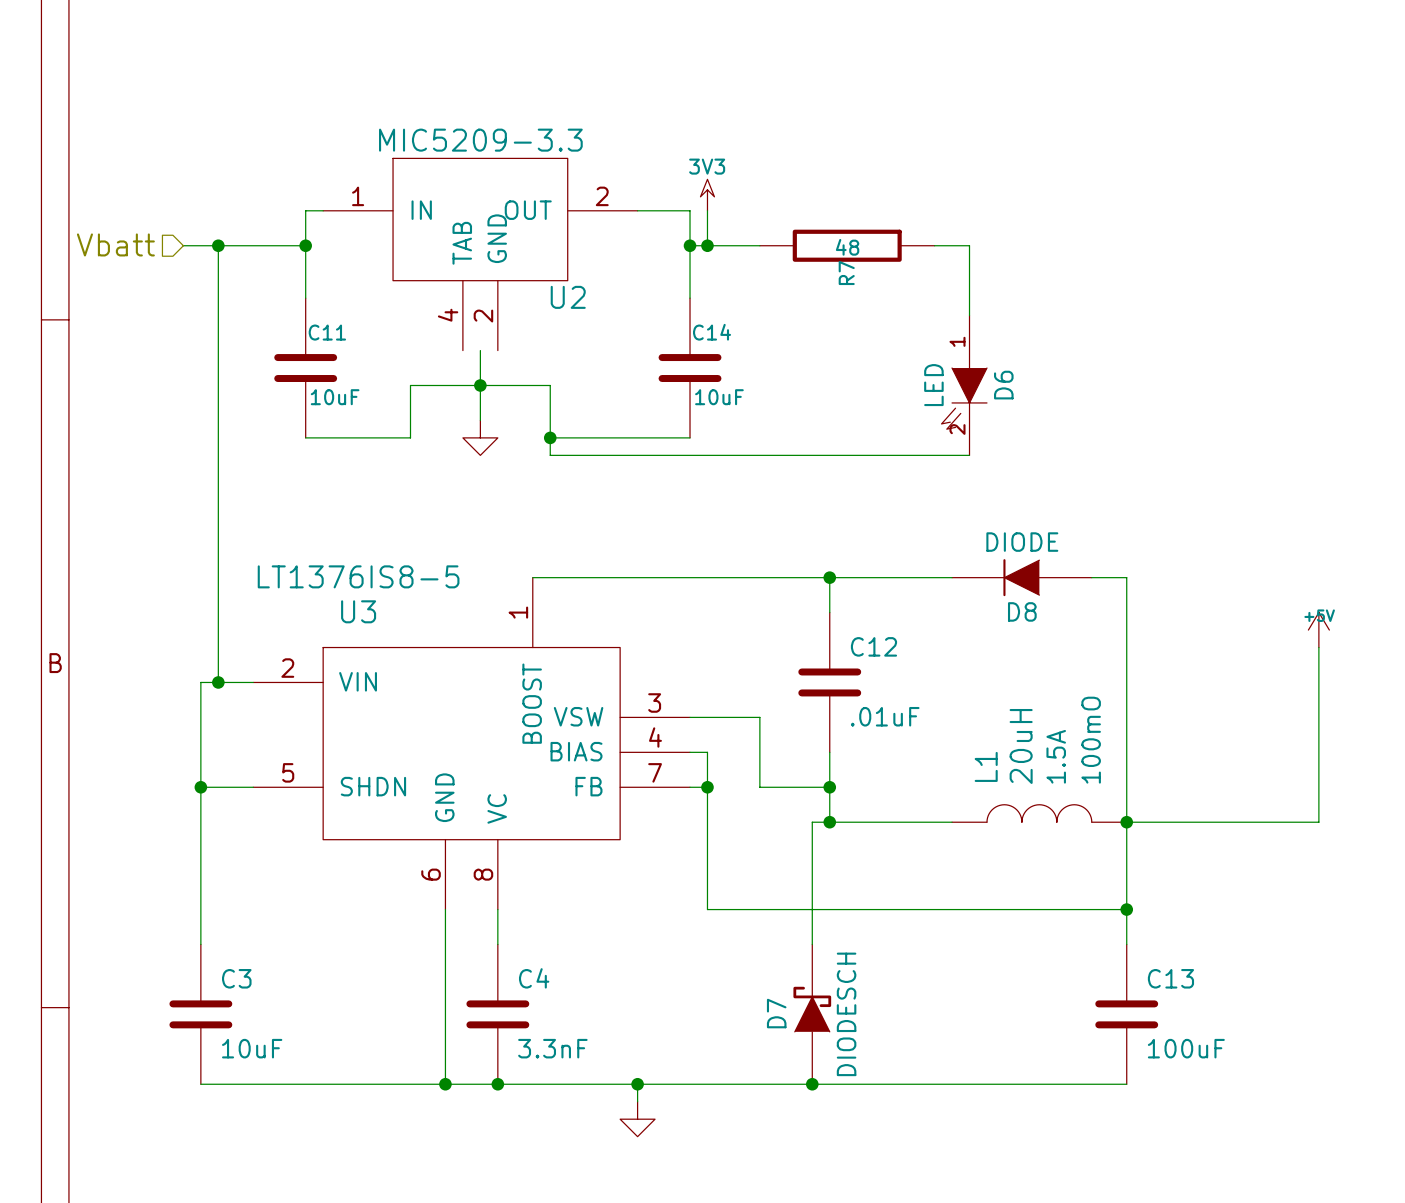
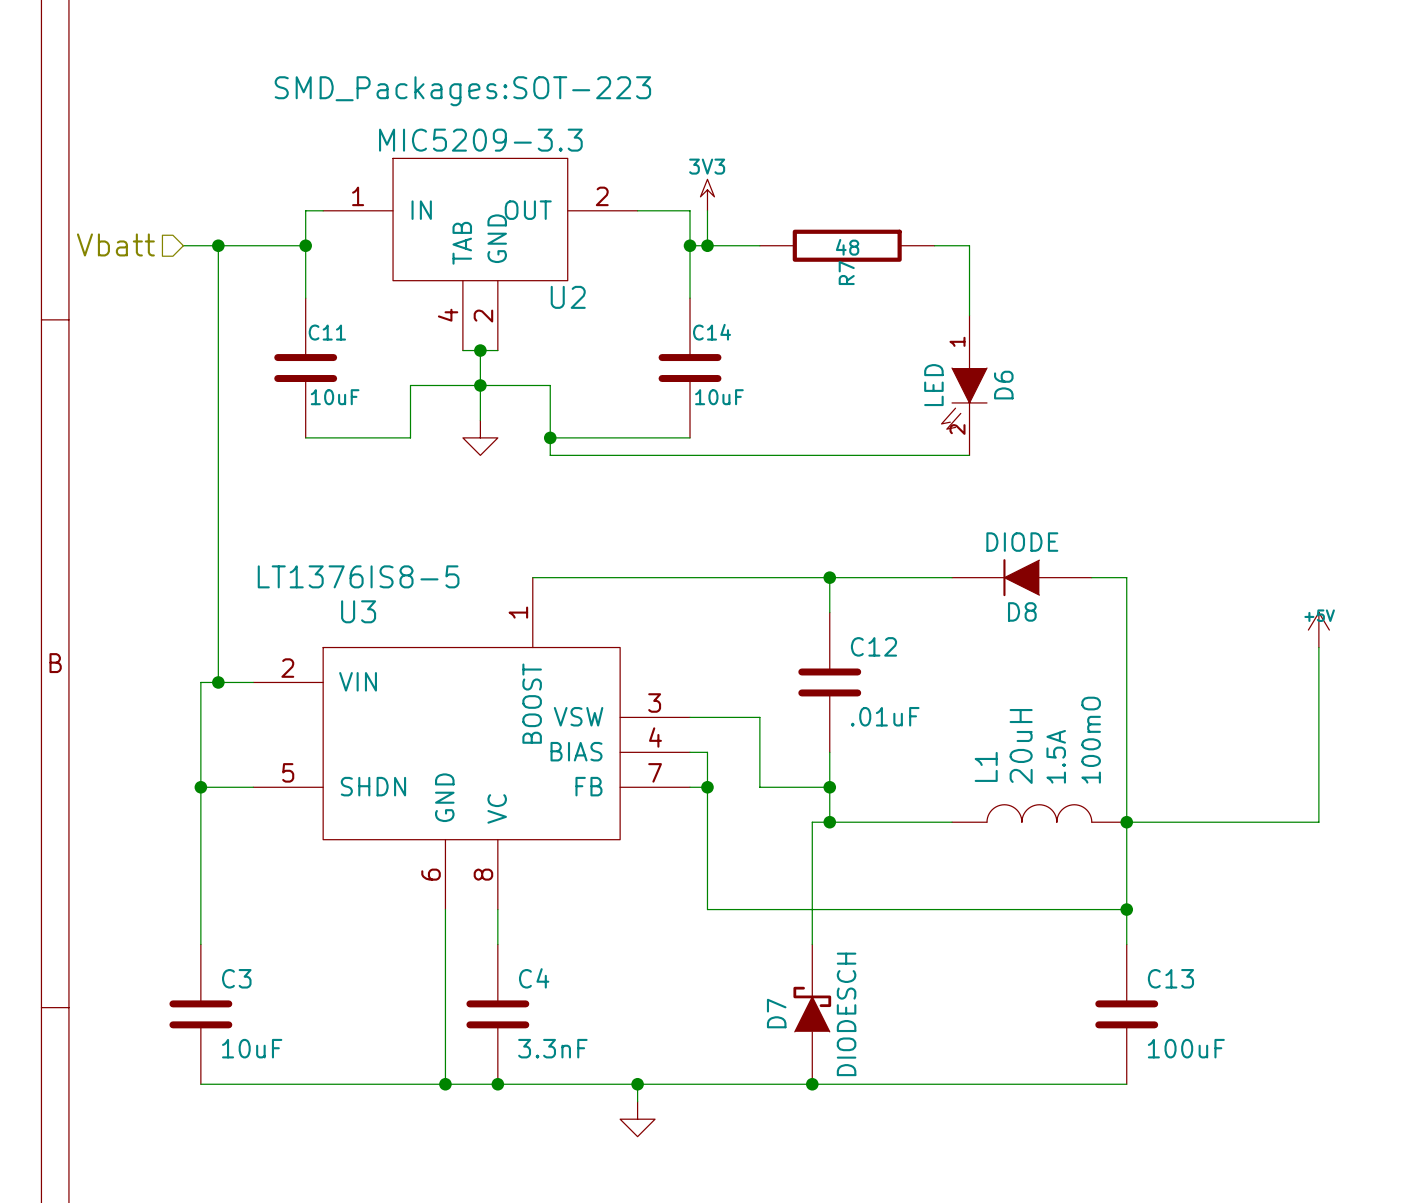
U2 text: none -> SMD_Packages:SOT-223 (462, 91)
wire: none -> (462, 350) (497, 350)
junction: none -> (480, 350)

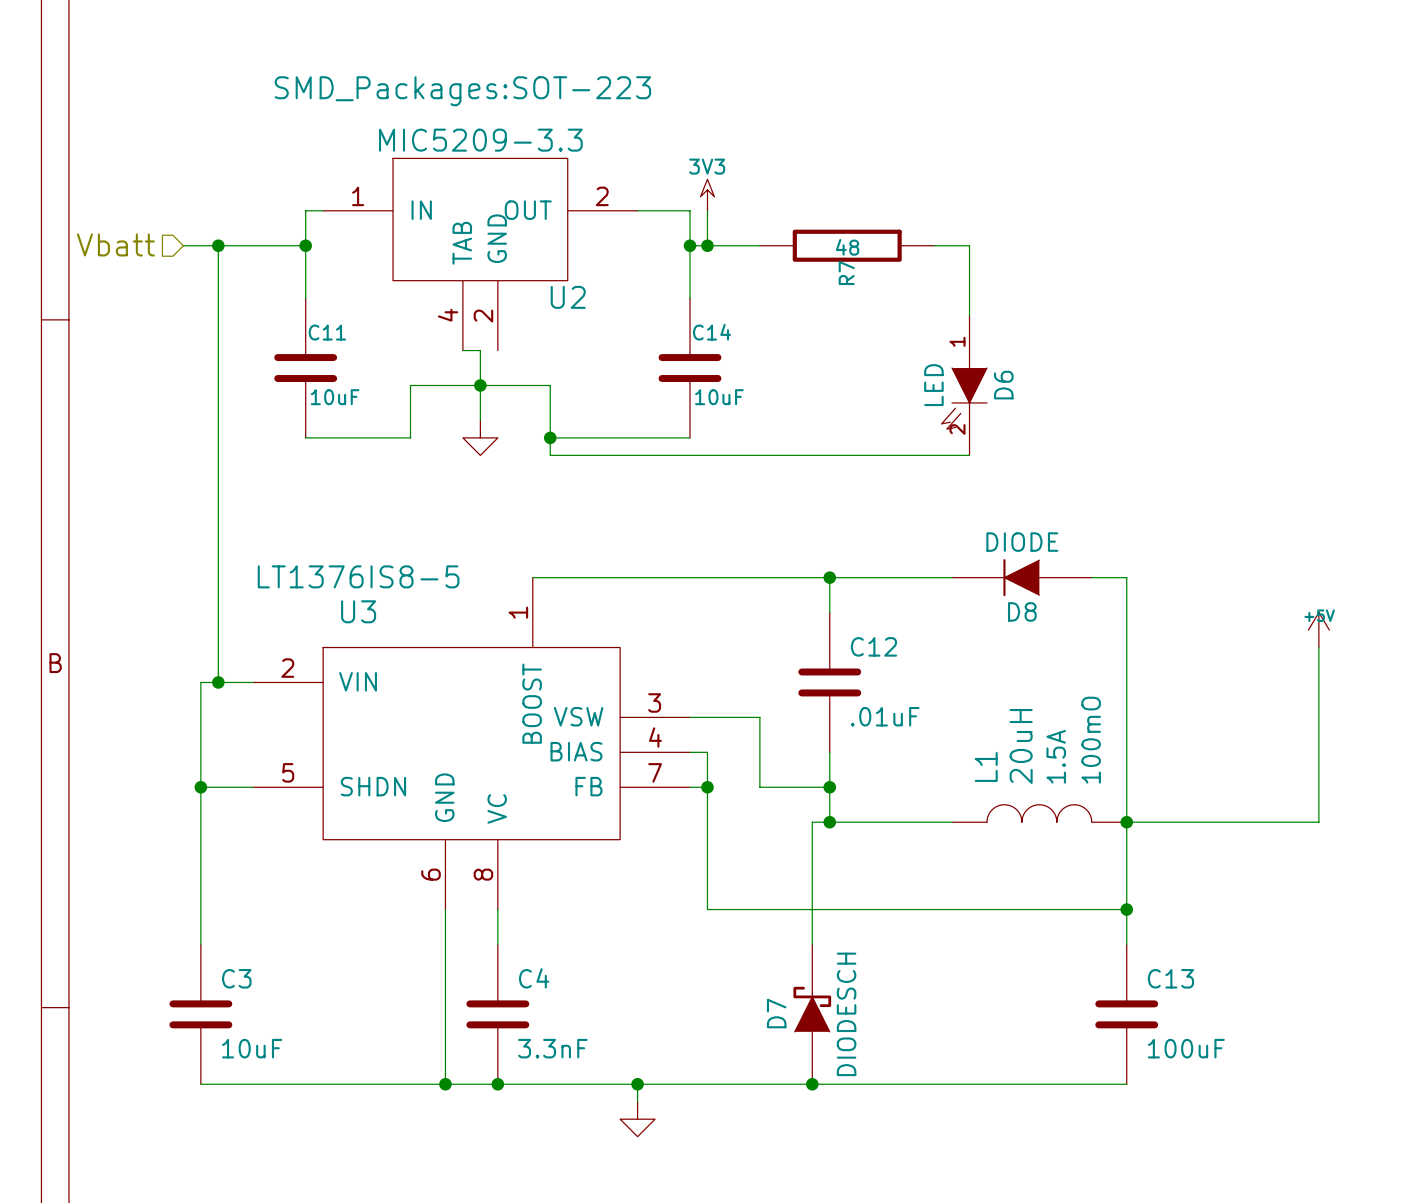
wire: (480, 350) (497, 350) -> none
junction: (480, 350) -> none

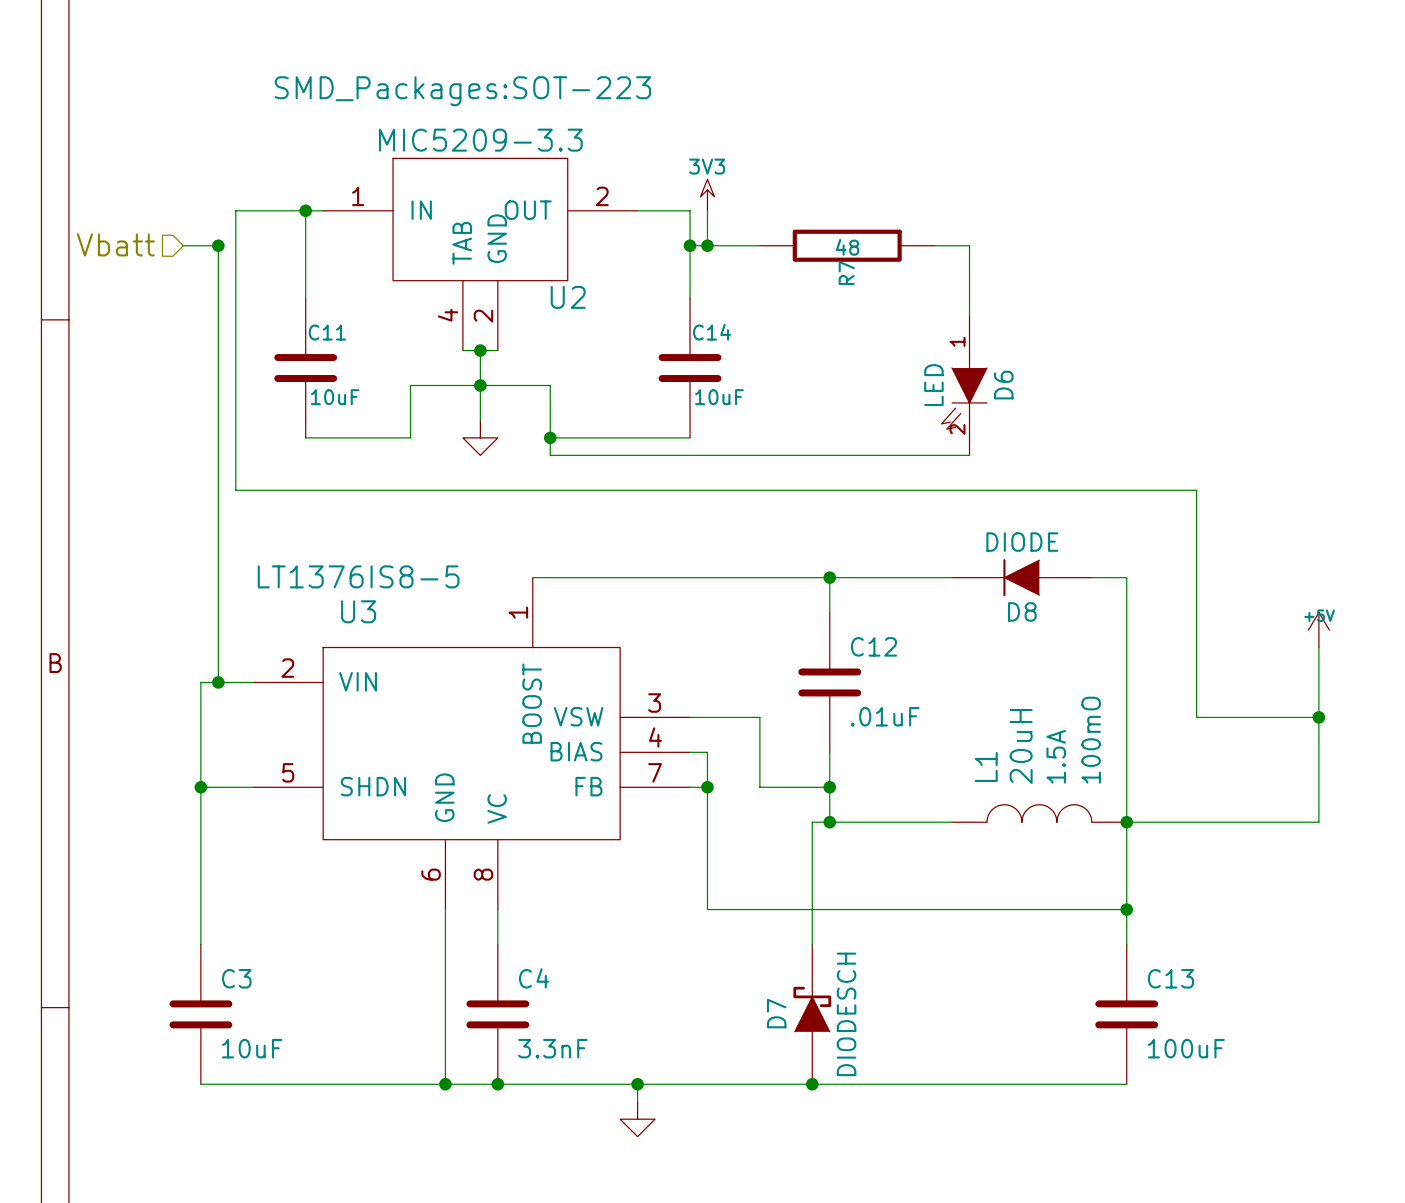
wire: none -> (305, 210) (235, 210) (235, 490) (1196, 490) (1196, 717) (1318, 717)
wire: (218, 245) (305, 245) -> none
junction position: (305, 245) -> (305, 210)
wire: none -> (480, 350) (497, 350)
junction: none -> (480, 350)
junction: none -> (1318, 717)

